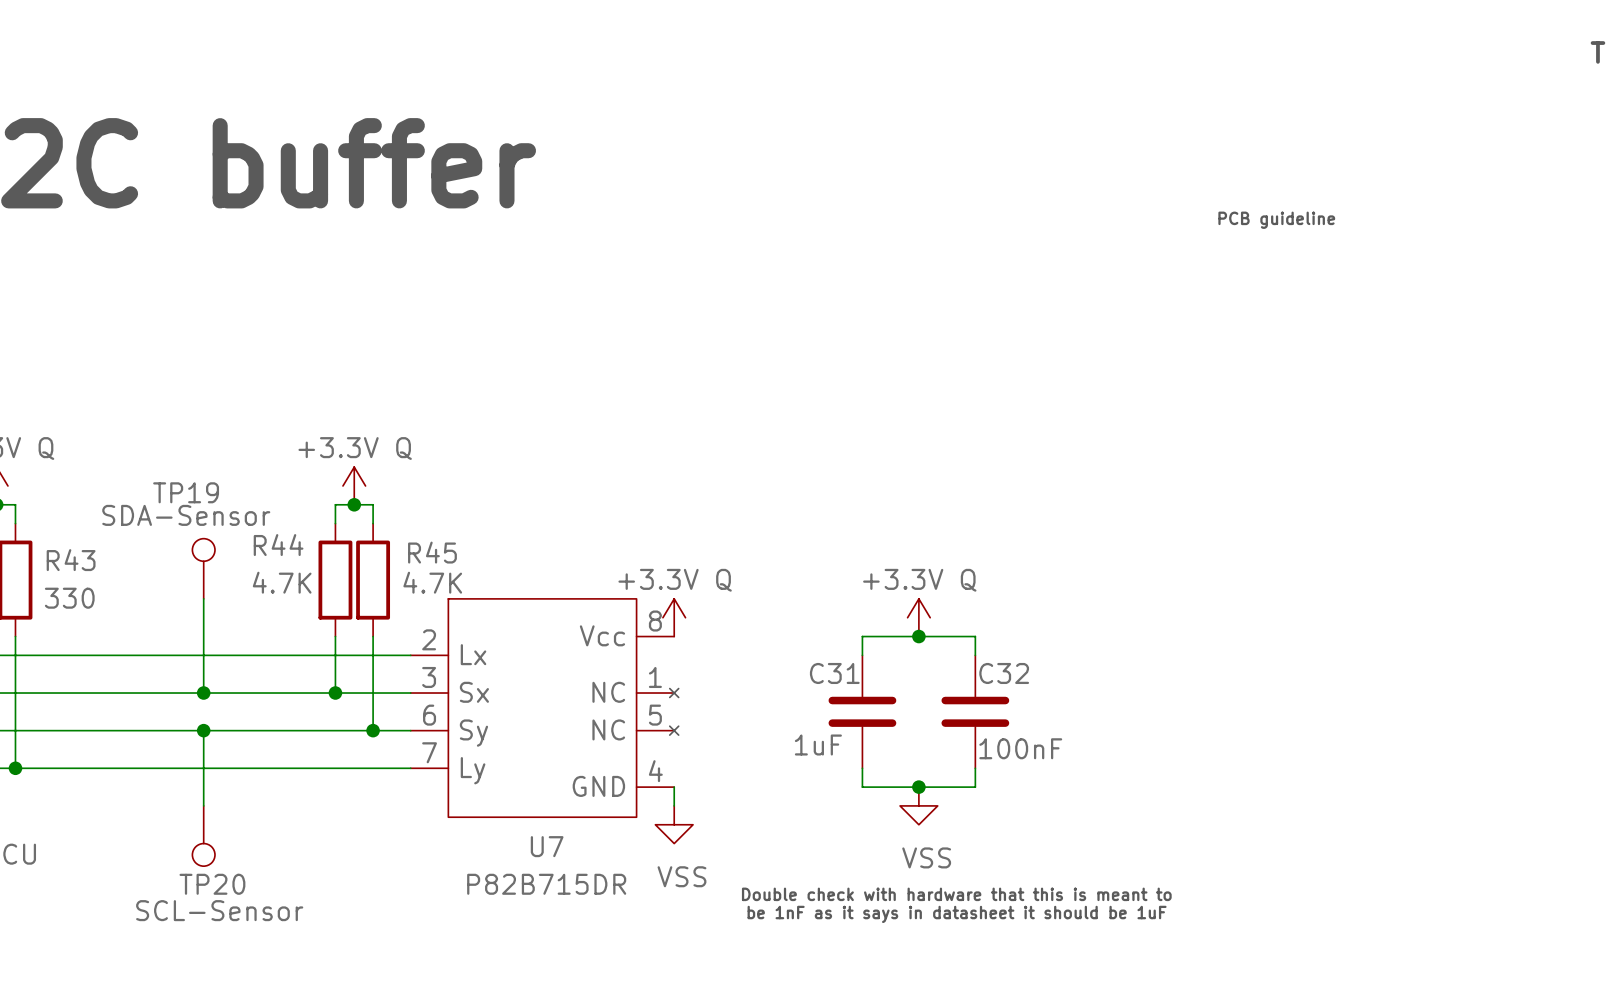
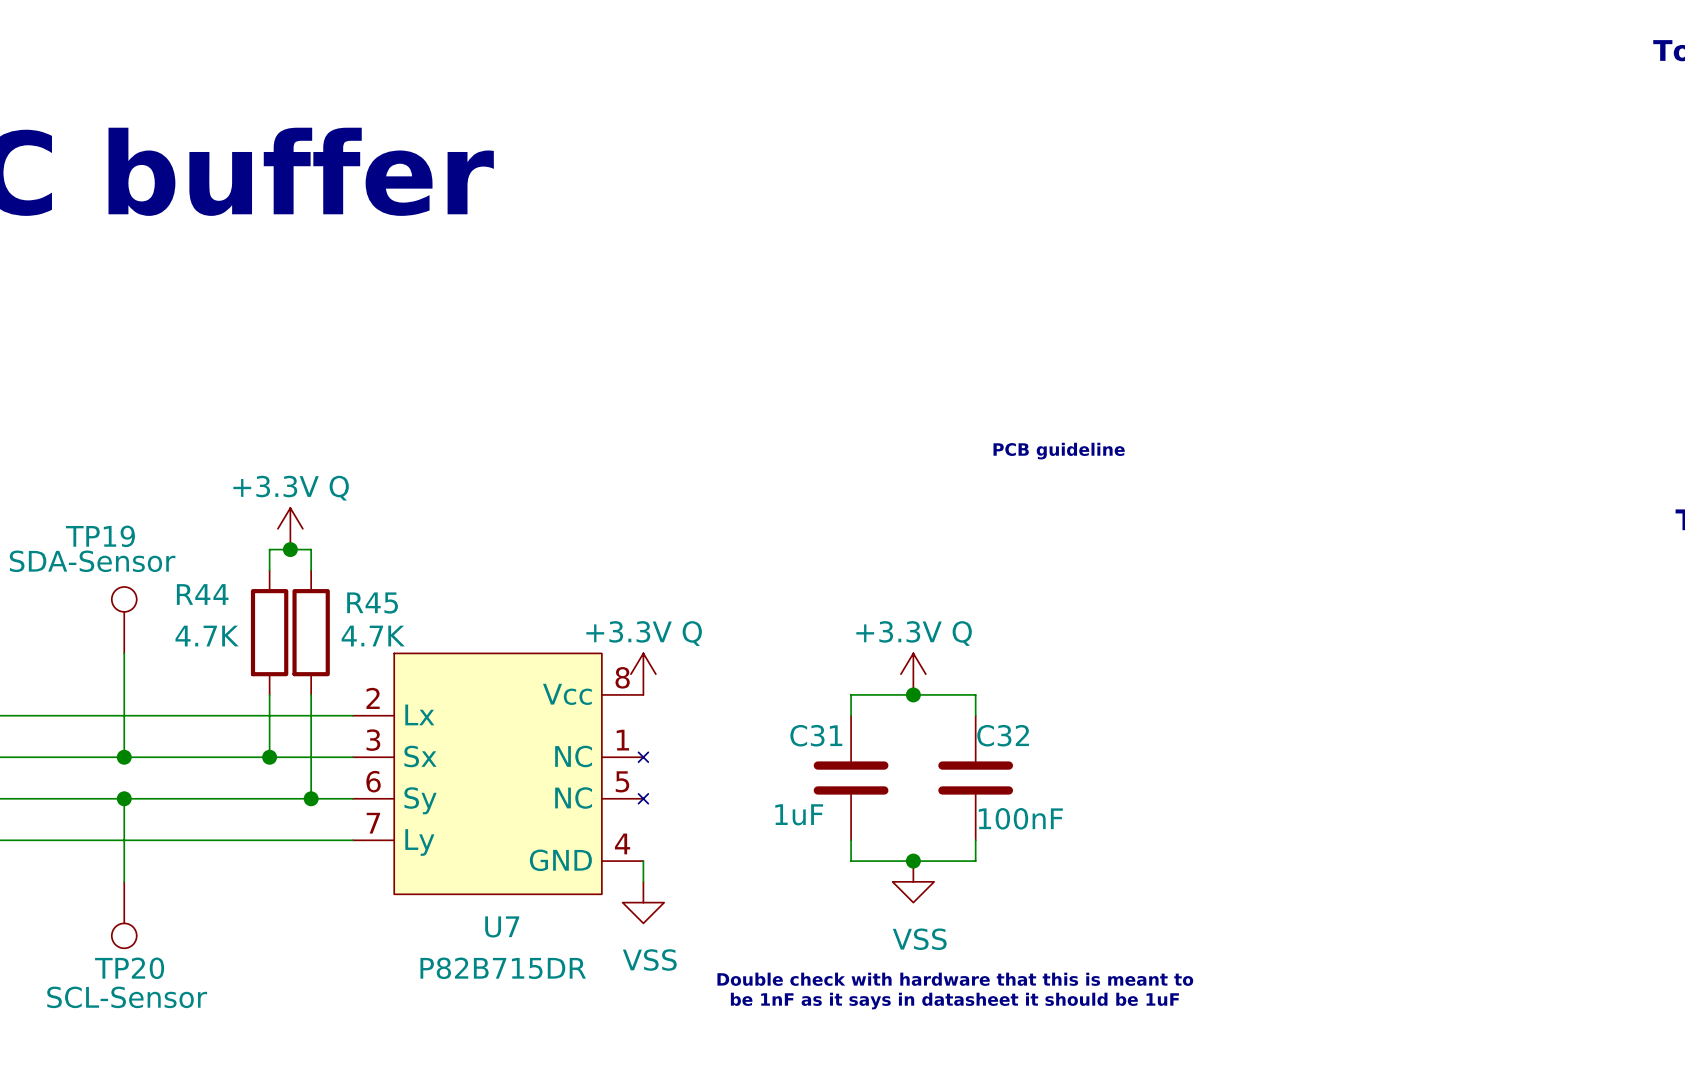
text position: PCB guideline (1276, 220) -> PCB guideline (1059, 451)

